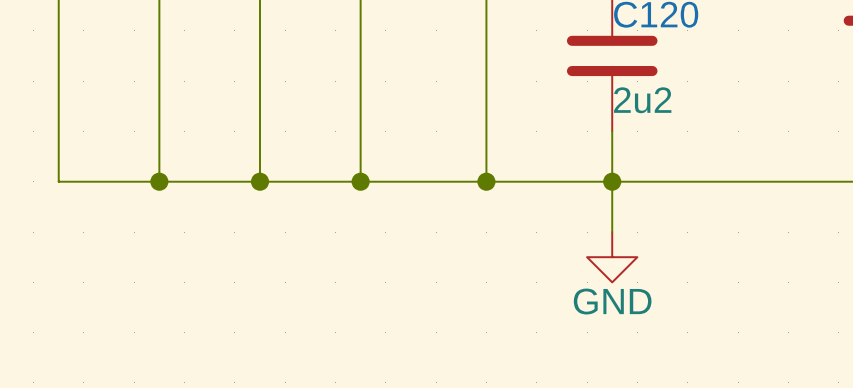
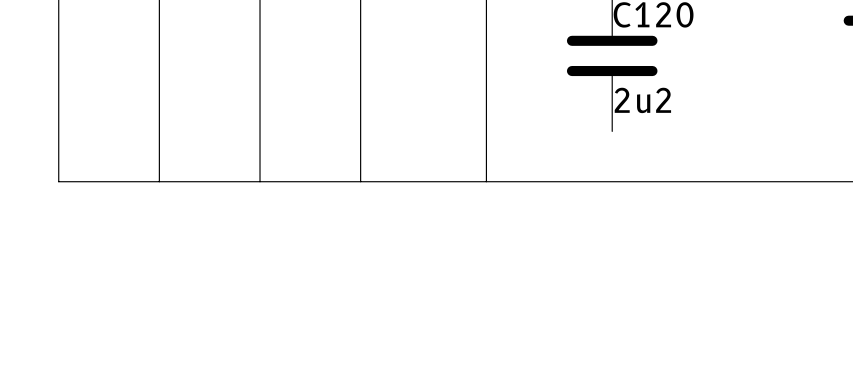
wire: (612, 131) (612, 232) -> none
junction: (159, 181) -> none
junction: (260, 181) -> none
junction: (360, 181) -> none
junction: (486, 181) -> none
junction: (612, 181) -> none
power symbol: GND (612, 257) -> none

